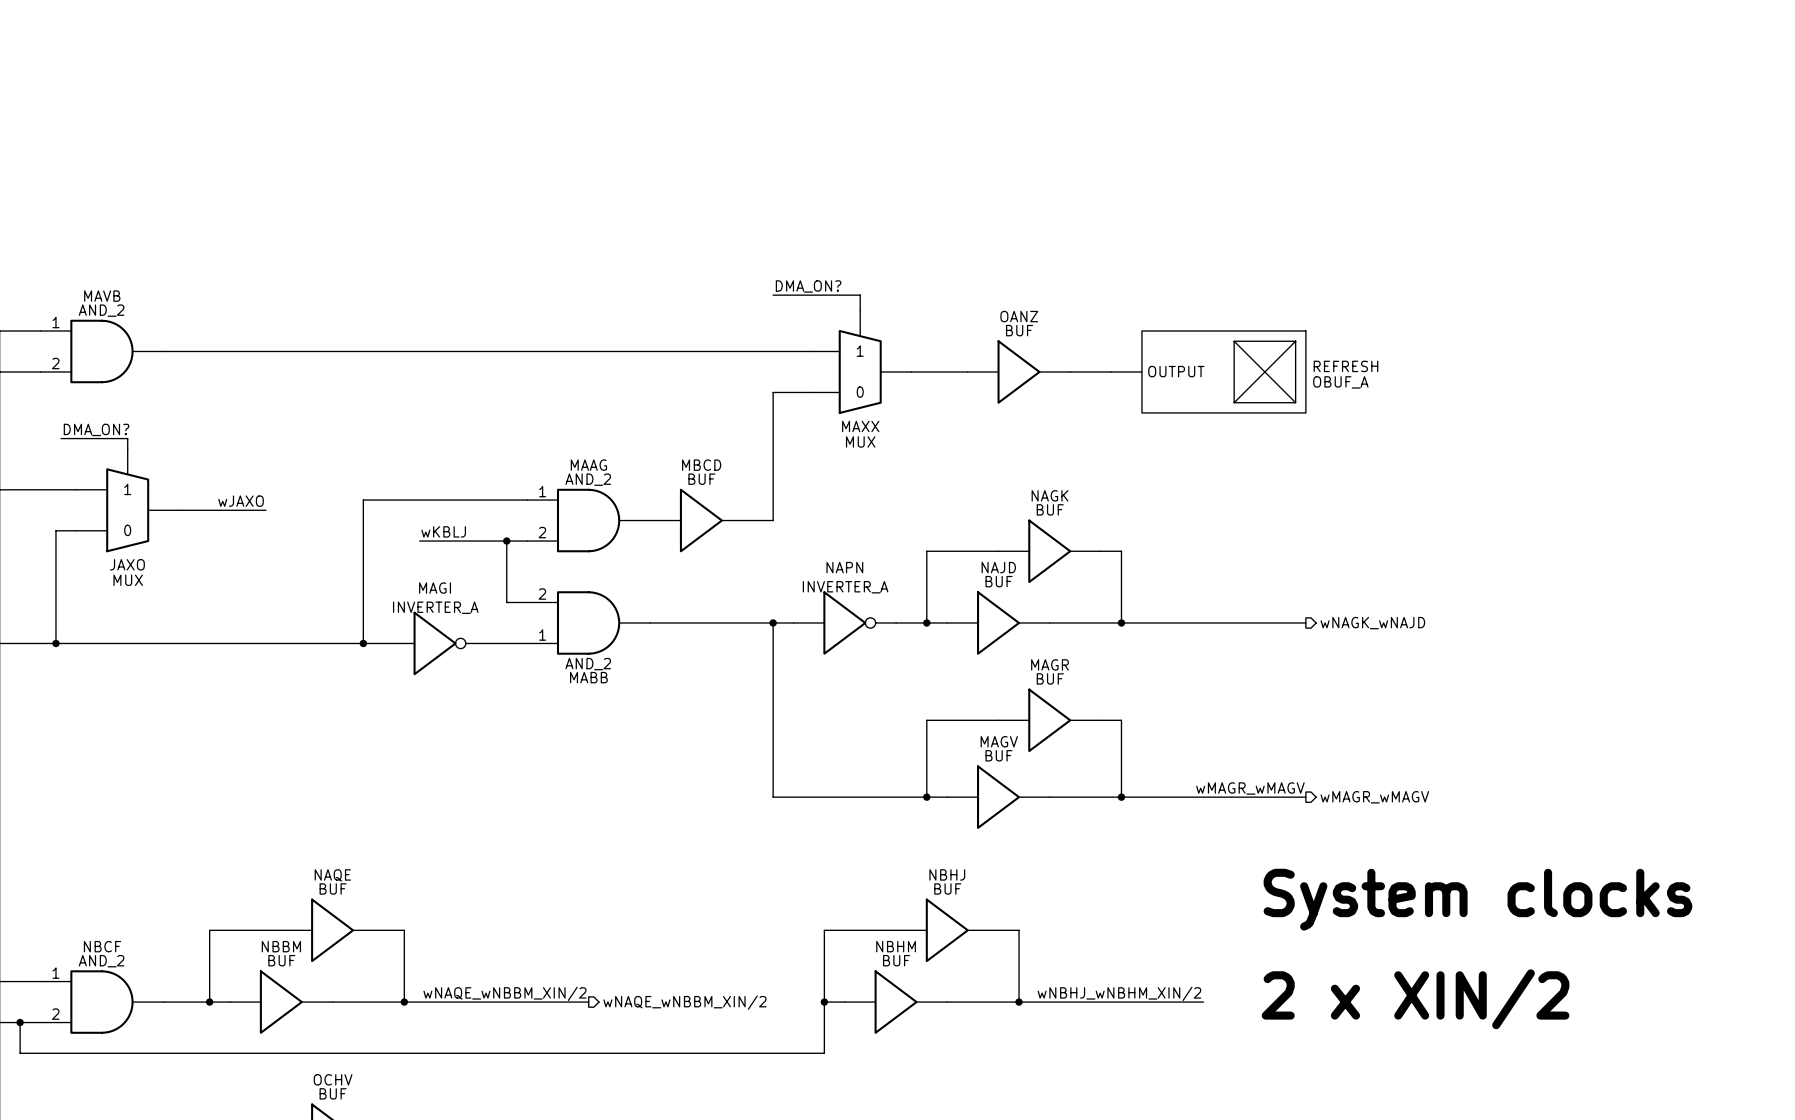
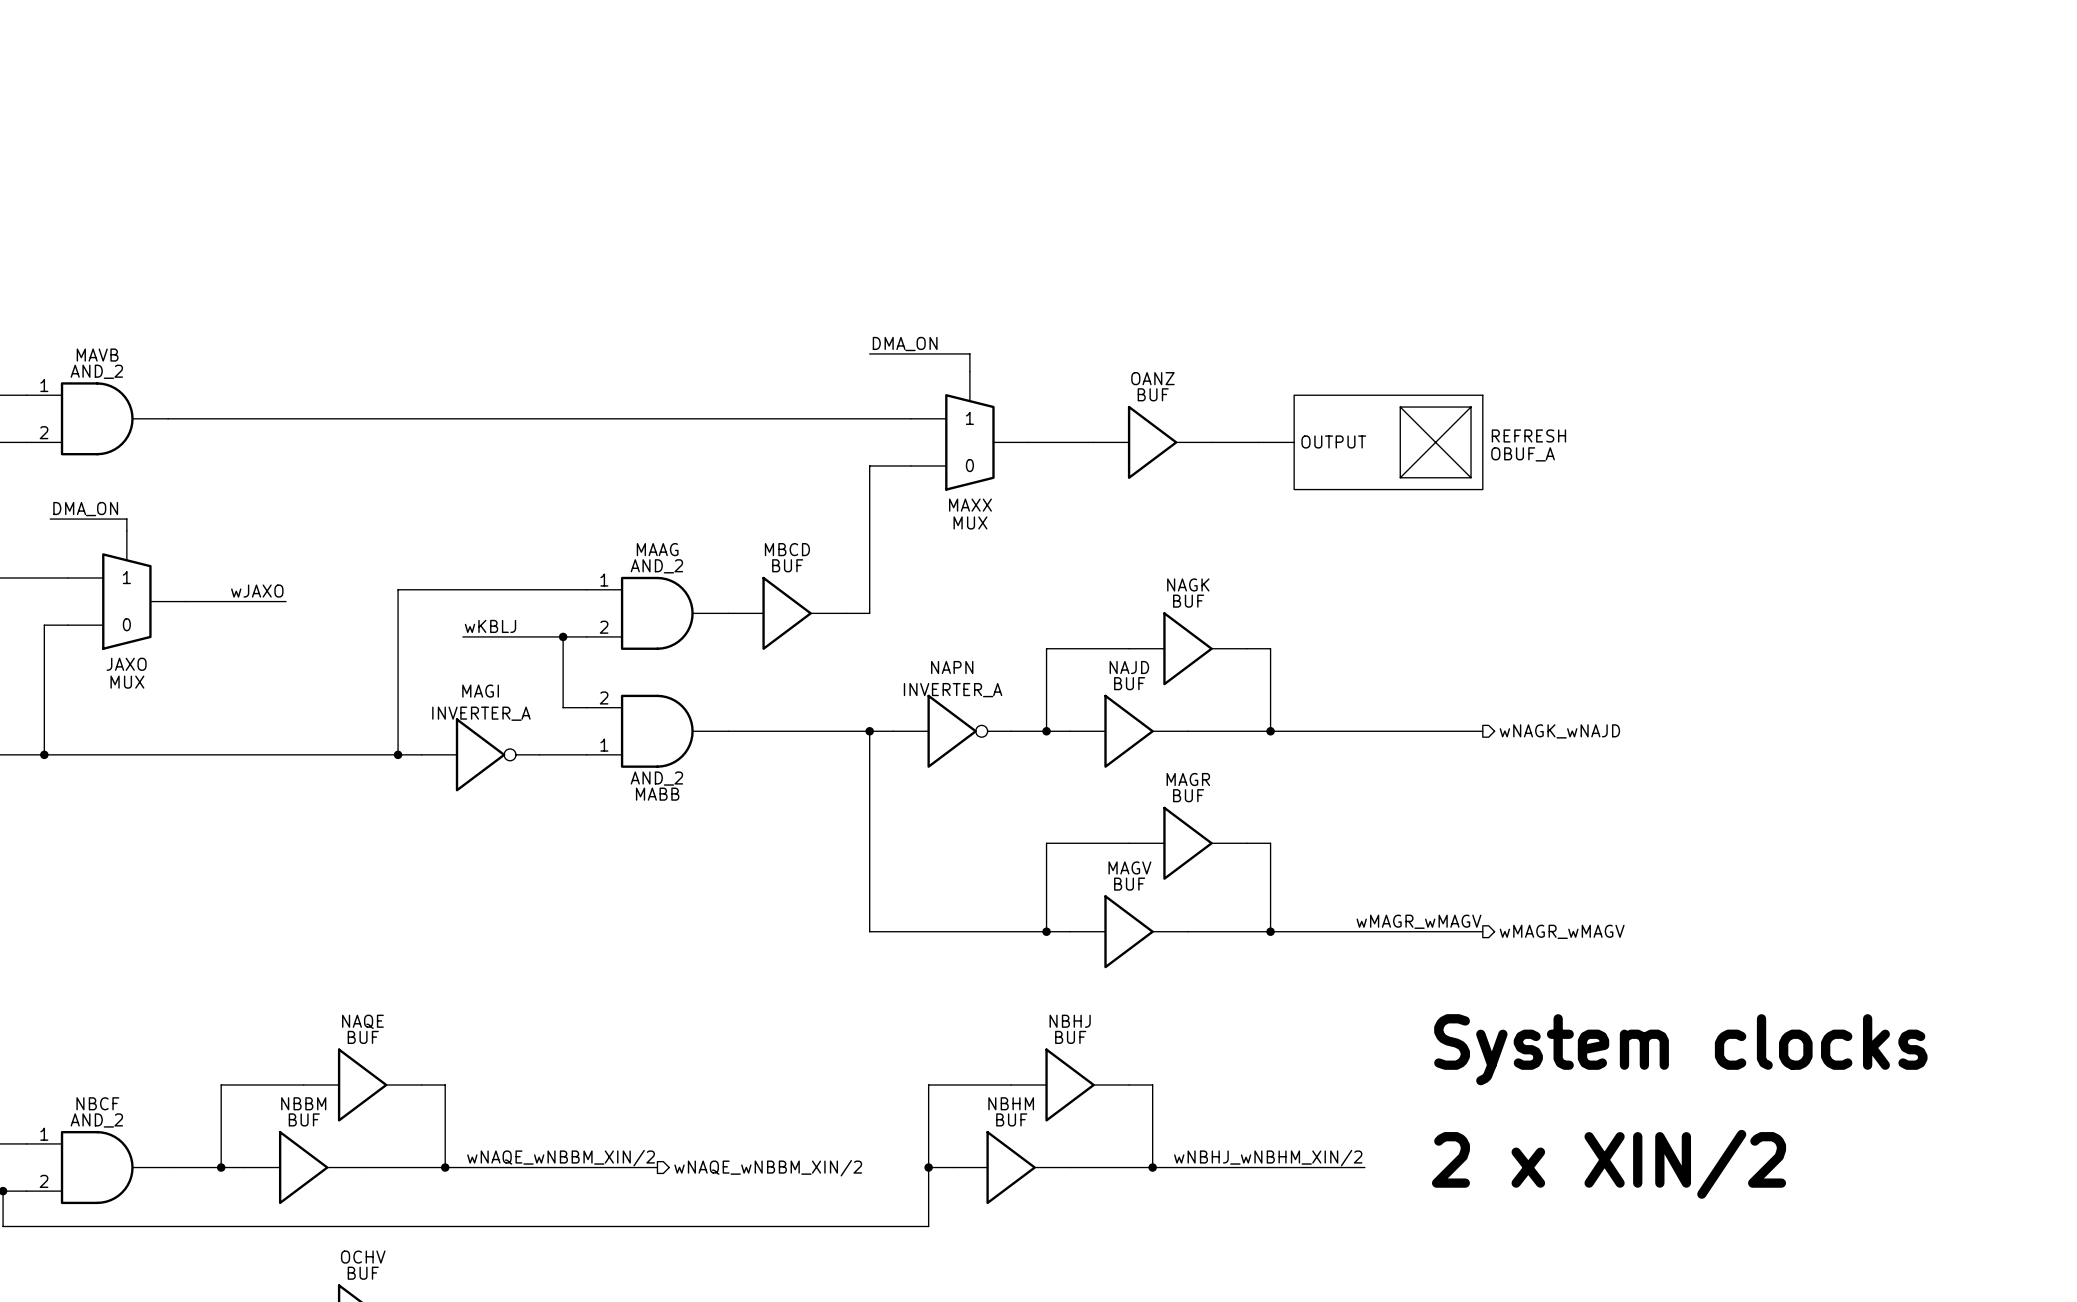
label: DMA_ON? (808, 286) -> DMA_ON (905, 344)
label: DMA_ON? (96, 429) -> DMA_ON (85, 509)

